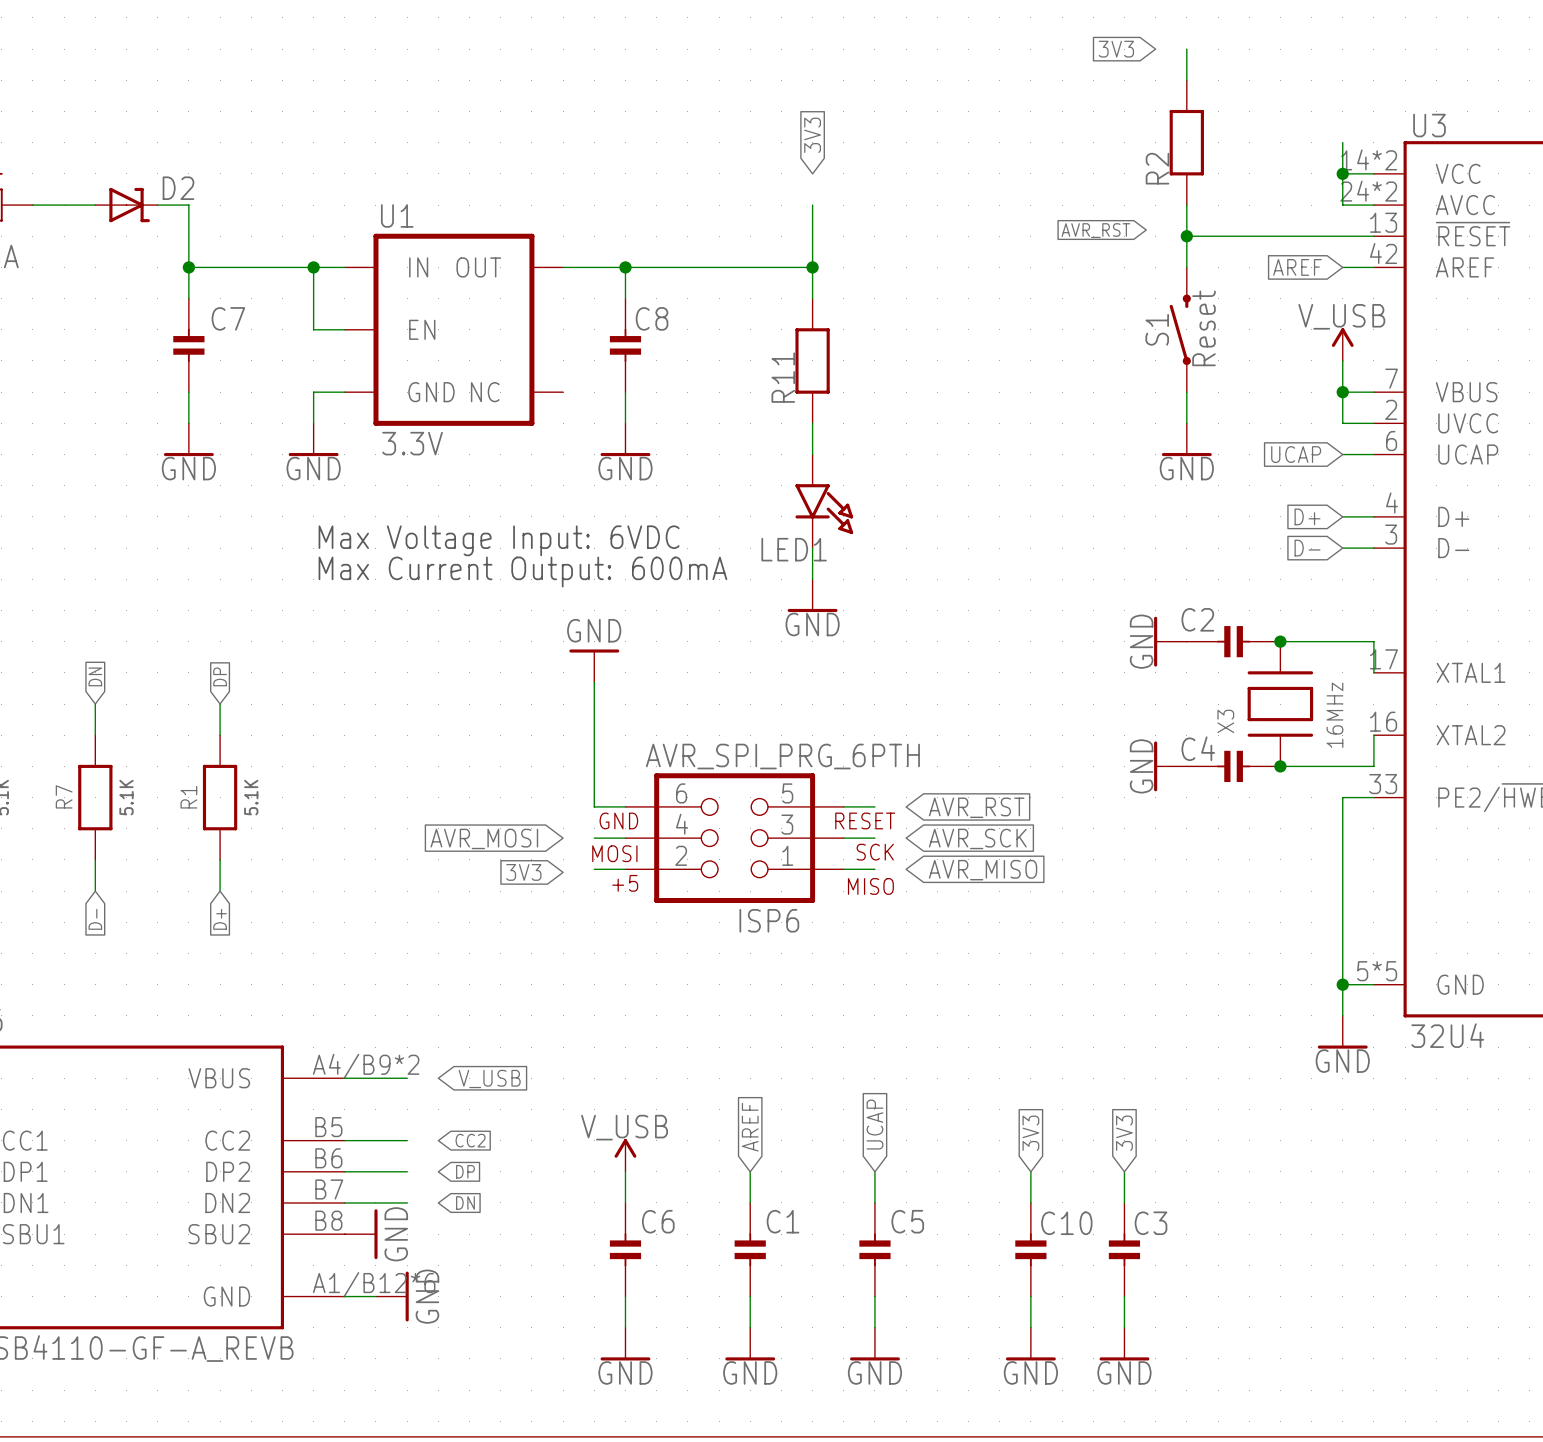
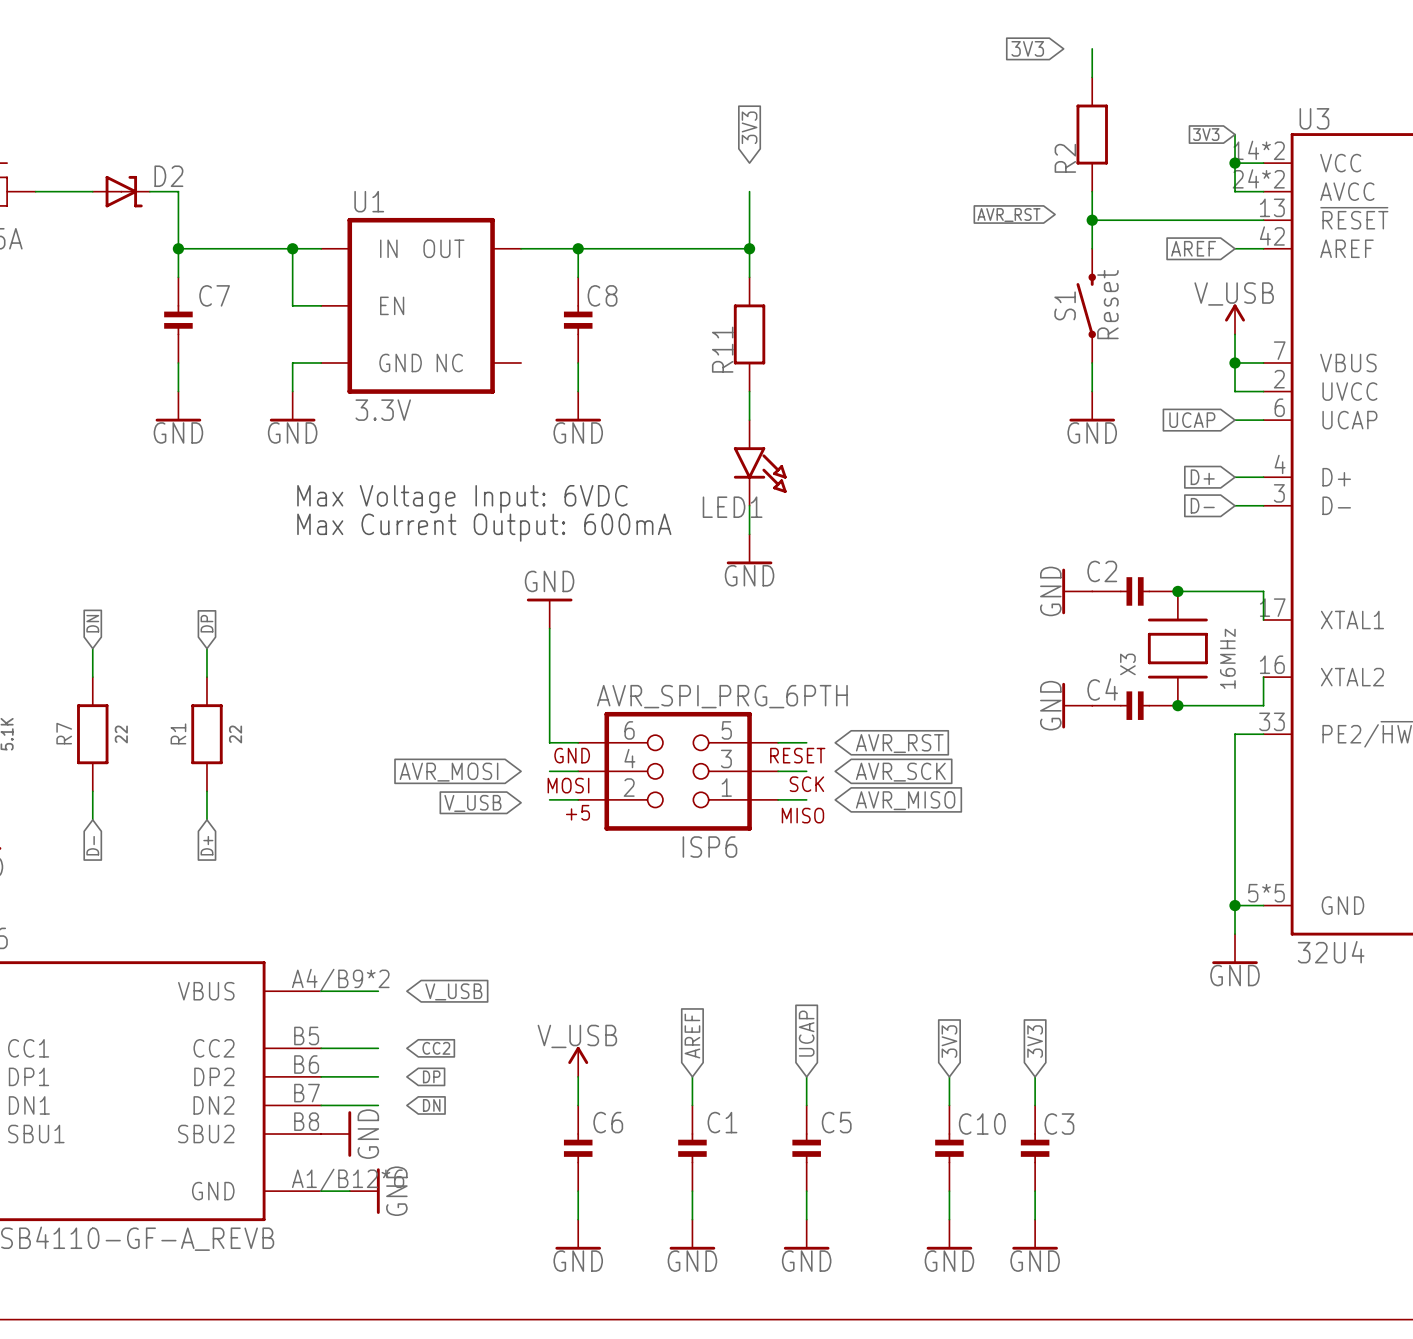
global label: none -> 3V3 (1206, 134)
R7 value: 5.1K (126, 797) -> 22 (121, 734)
R1 value: 5.1K (251, 797) -> 22 (235, 734)
global label: 3V3 (523, 872) -> V_USB (472, 803)

